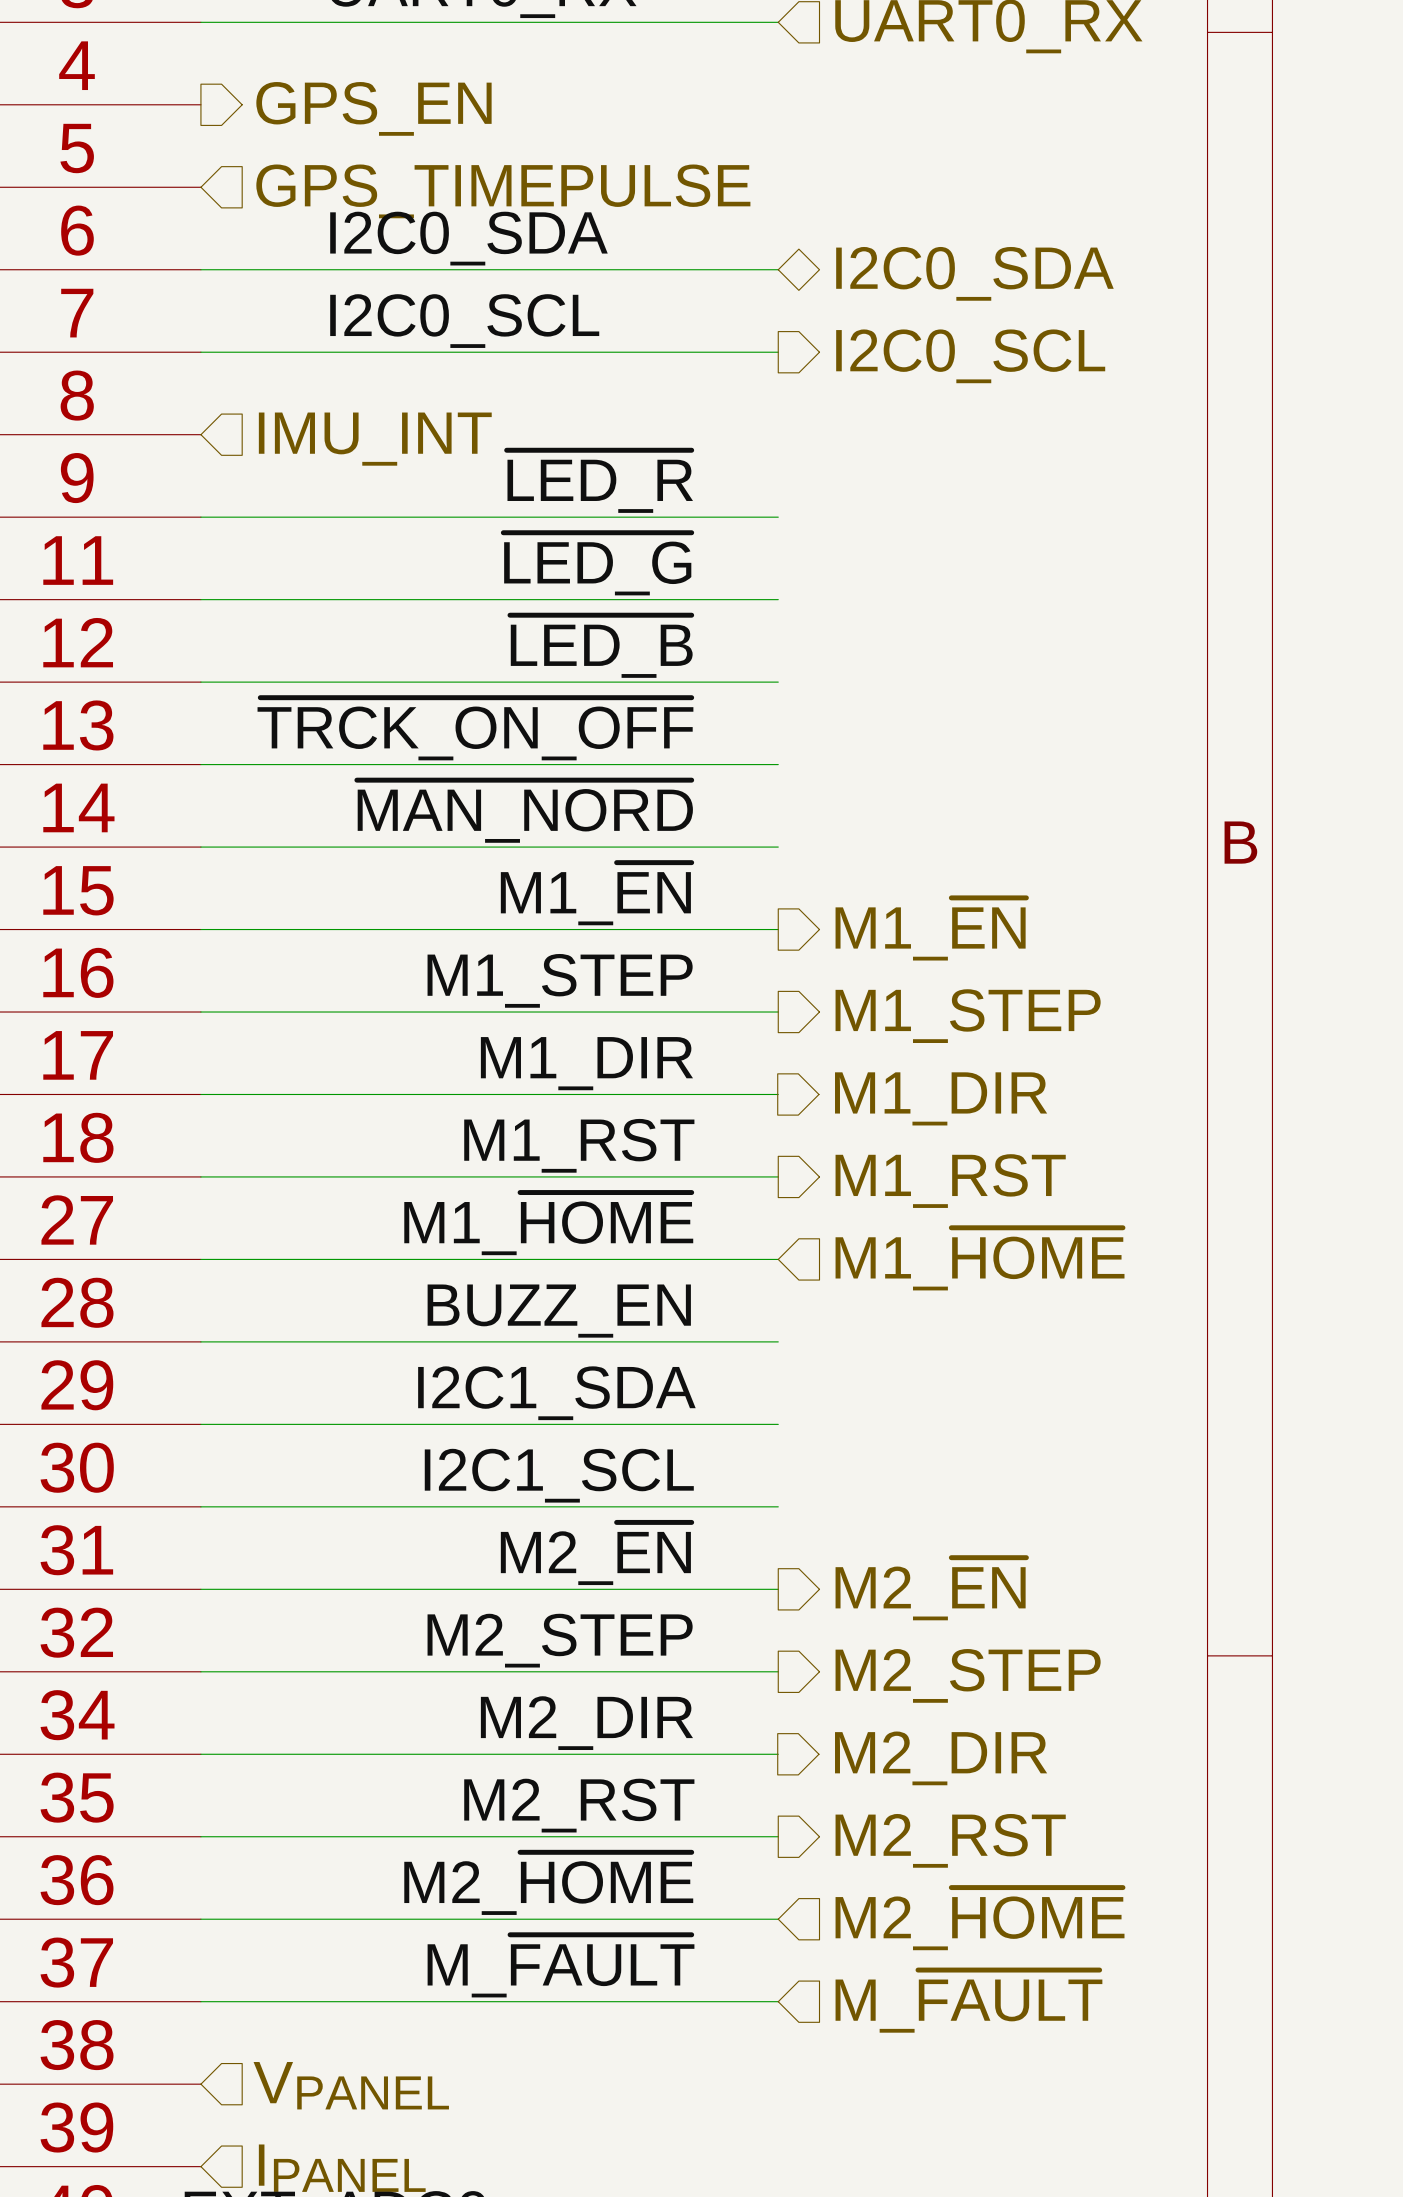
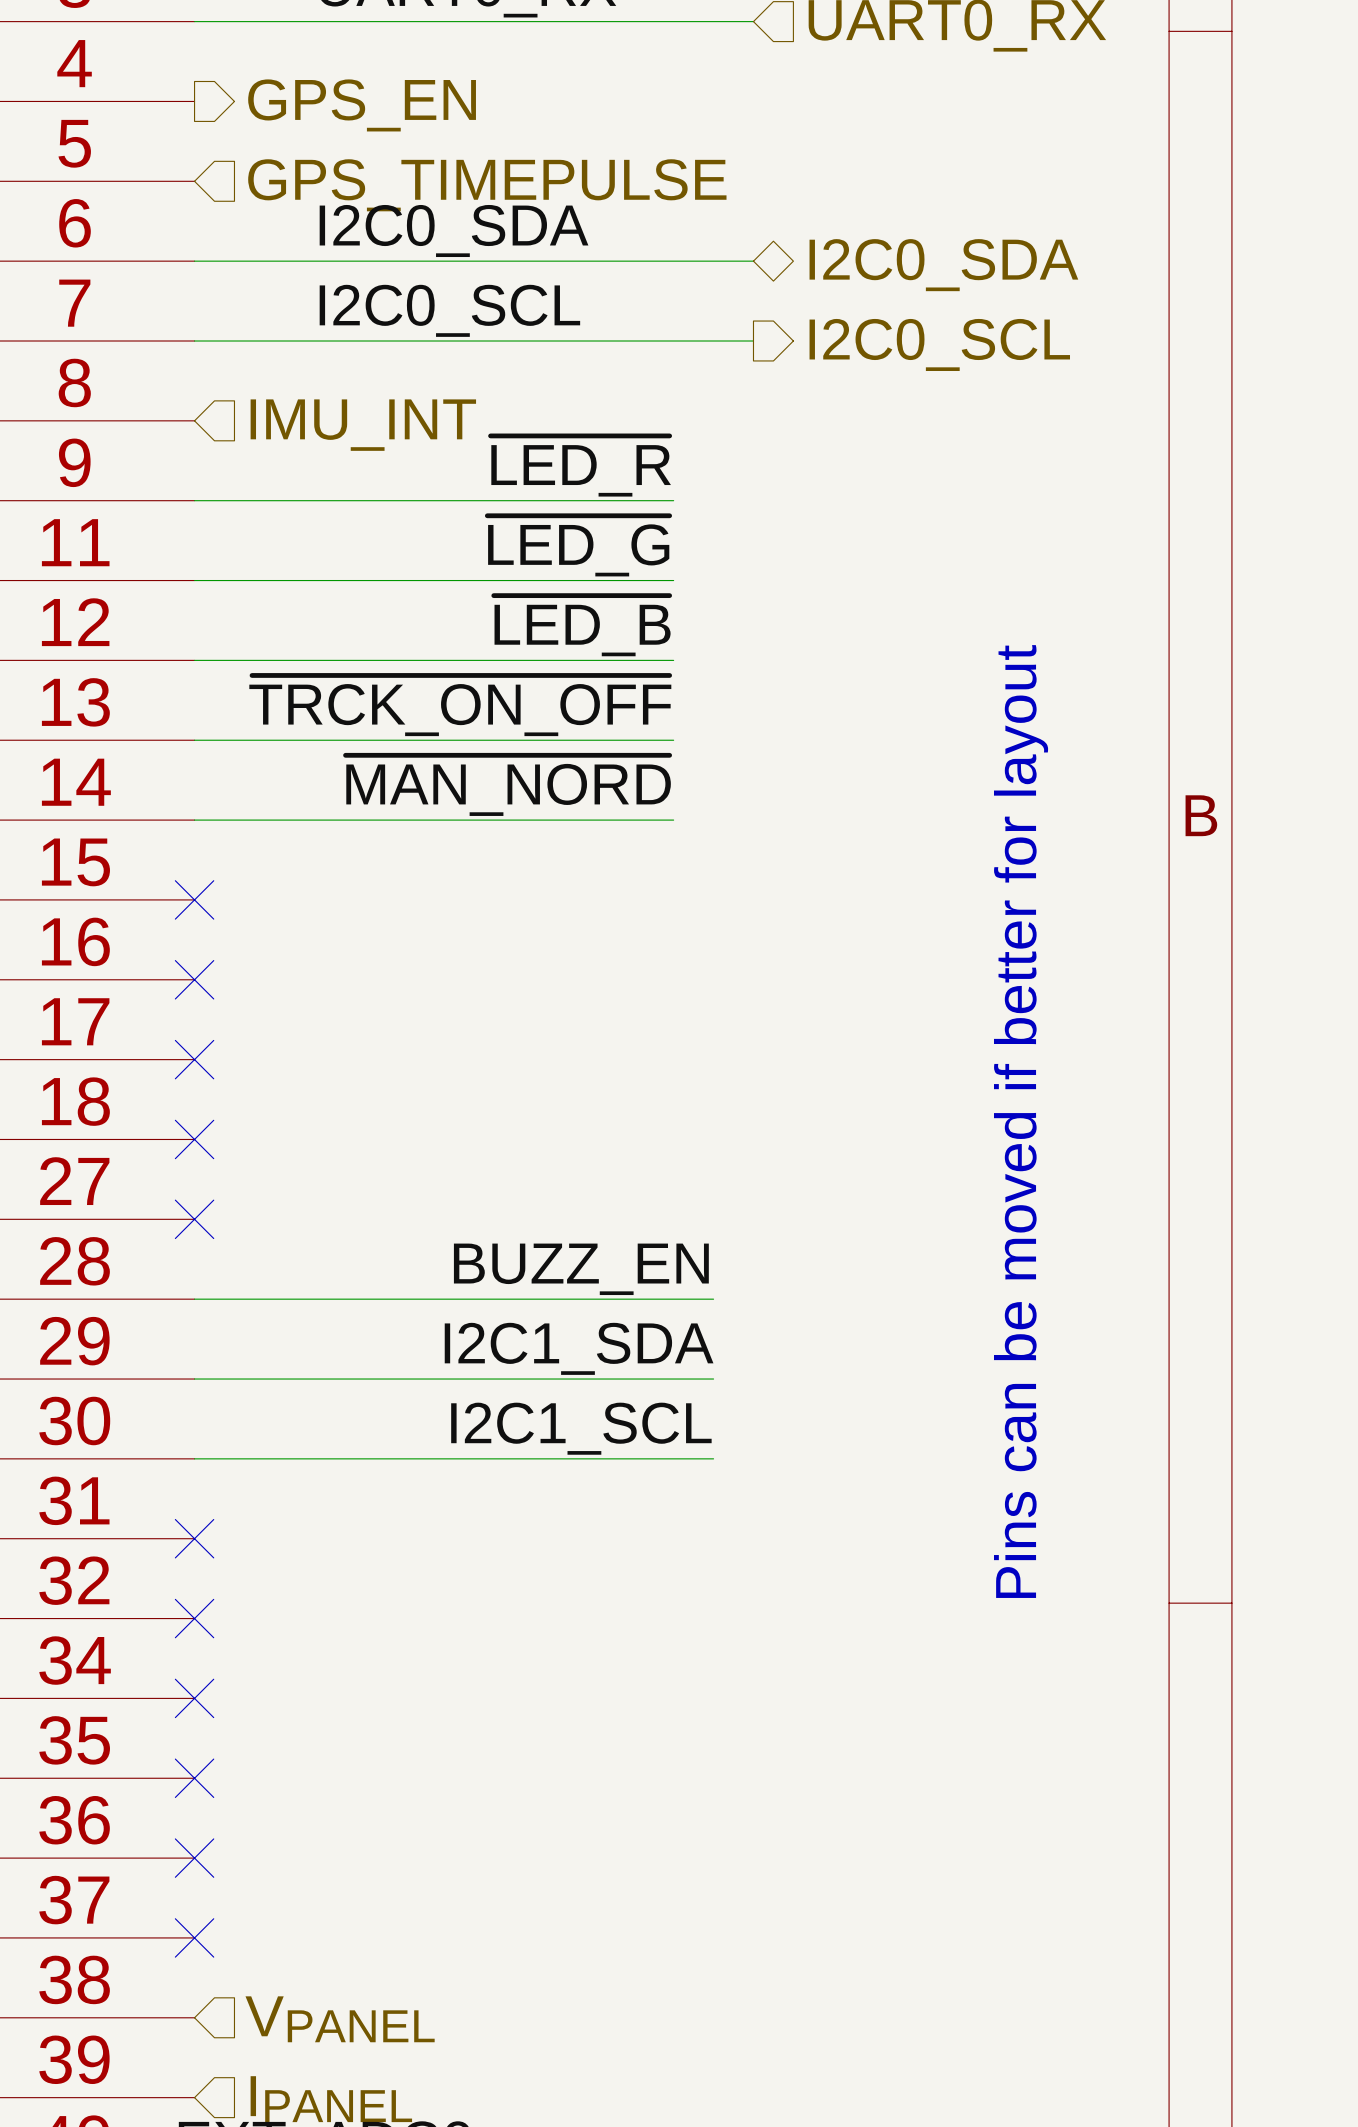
wire: (695, 517) (778, 517) -> none
wire: (695, 599) (778, 599) -> none
wire: (695, 682) (778, 682) -> none
wire: (695, 764) (778, 764) -> none
wire: (695, 847) (778, 847) -> none
label: M1_~{EN} (596, 893) -> none
wire: (200, 929) (778, 929) -> none
no-connect mark: none -> (194, 899)
hierarchical label: M1_~{EN} (930, 929) -> none
label: M1_STEP (560, 980) -> none
wire: (200, 1012) (778, 1012) -> none
no-connect mark: none -> (194, 979)
hierarchical label: M1_STEP (968, 1016) -> none
label: M1_DIR (586, 1063) -> none
wire: (200, 1094) (778, 1094) -> none
no-connect mark: none -> (194, 1059)
hierarchical label: M1_DIR (941, 1098) -> none
label: M1_RST (579, 1145) -> none
text: none -> Pins can be moved if better for layout (1021, 1121)
wire: (200, 1176) (778, 1176) -> none
no-connect mark: none -> (194, 1139)
hierarchical label: M1_RST (950, 1181) -> none
label: M1_~{HOME} (548, 1223) -> none
wire: (200, 1259) (778, 1259) -> none
no-connect mark: none -> (194, 1219)
hierarchical label: M1_~{HOME} (980, 1259) -> none
label position: BUZZ_EN (559, 1311) -> BUZZ_EN (581, 1269)
wire: (737, 1341) (778, 1341) -> none
label position: I2C1_SDA (556, 1393) -> I2C1_SDA (579, 1348)
wire: (737, 1424) (778, 1424) -> none
label position: I2C1_SCL (559, 1475) -> I2C1_SCL (581, 1428)
wire: (737, 1506) (778, 1506) -> none
label: M2_~{EN} (596, 1553) -> none
hierarchical label: M2_~{EN} (930, 1588) -> none
wire: (200, 1589) (778, 1589) -> none
no-connect mark: none -> (194, 1538)
label: M2_STEP (560, 1640) -> none
wire: (200, 1671) (778, 1671) -> none
no-connect mark: none -> (194, 1618)
hierarchical label: M2_STEP (968, 1675) -> none
label: M2_DIR (586, 1723) -> none
wire: (200, 1754) (778, 1754) -> none
no-connect mark: none -> (194, 1698)
hierarchical label: M2_DIR (941, 1758) -> none
label: M2_RST (579, 1805) -> none
wire: (200, 1836) (778, 1836) -> none
no-connect mark: none -> (194, 1778)
hierarchical label: M2_RST (950, 1840) -> none
label: M2_~{HOME} (548, 1883) -> none
hierarchical label: M2_~{HOME} (980, 1918) -> none
wire: (200, 1919) (778, 1919) -> none
no-connect mark: none -> (194, 1858)
label: M_~{FAULT} (561, 1966) -> none
wire: (200, 2001) (778, 2001) -> none
no-connect mark: none -> (194, 1937)
hierarchical label: M_~{FAULT} (968, 2001) -> none

